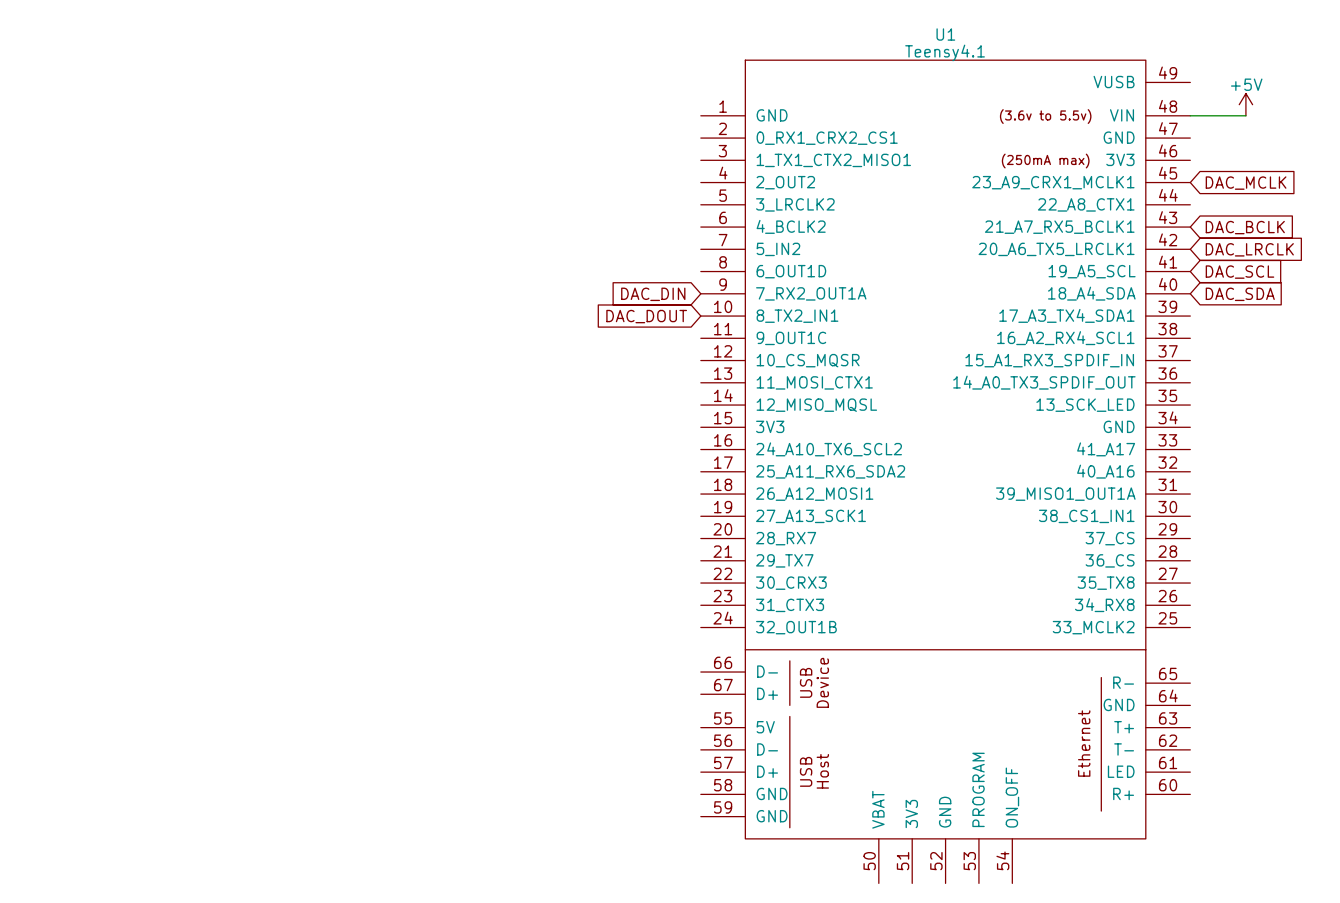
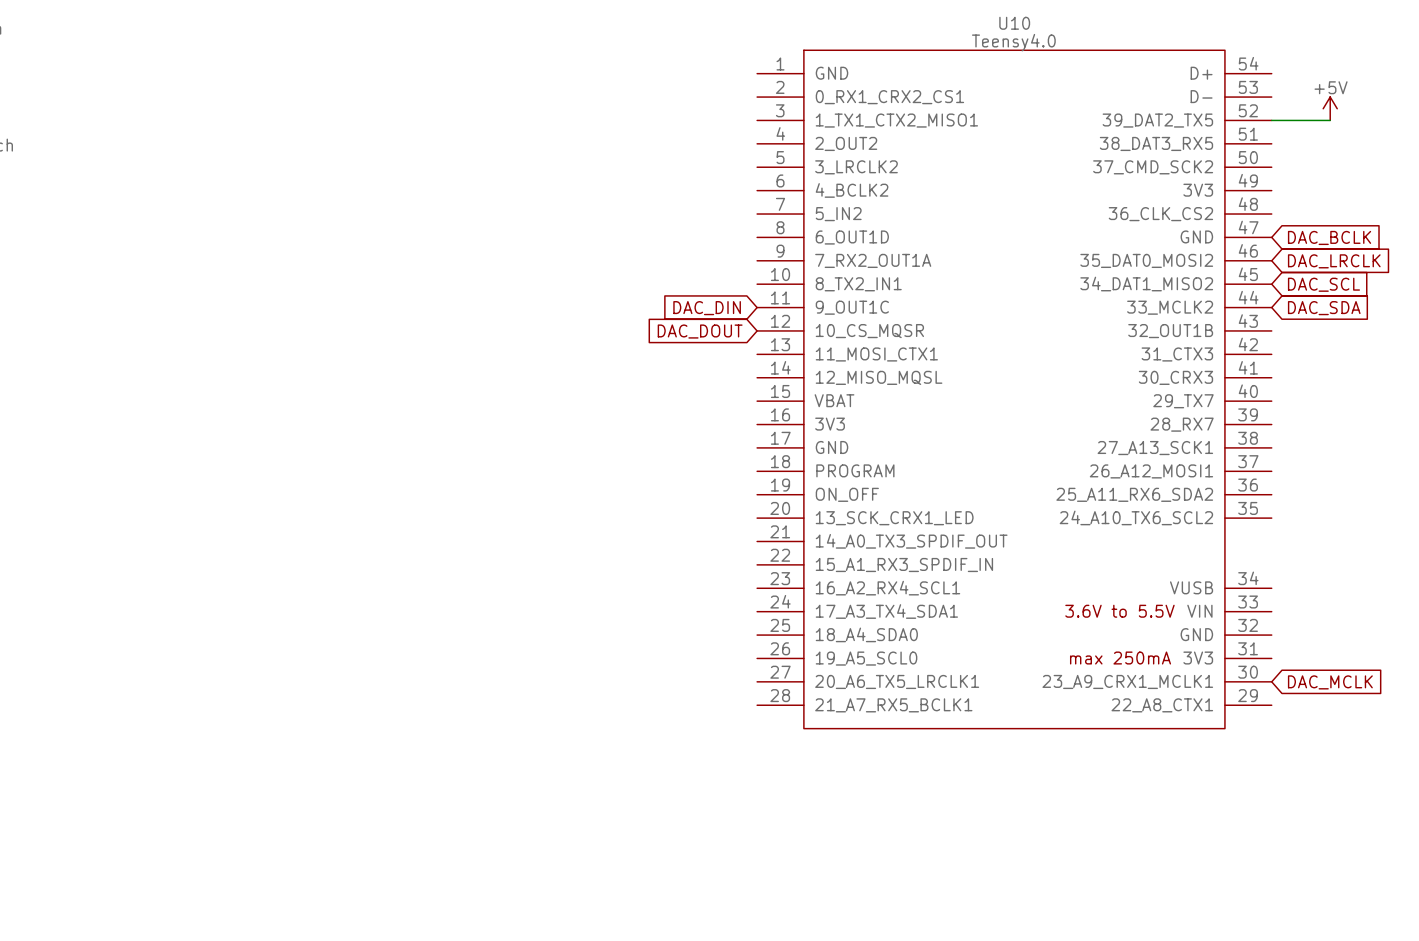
global label: DAC_MCLK (1246, 183) -> none
U10: none -> Teensy4.0 (1014, 389)
U1: Teensy4.1 (945, 471) -> none
global label: none -> DAC_MCLK (1330, 682)

